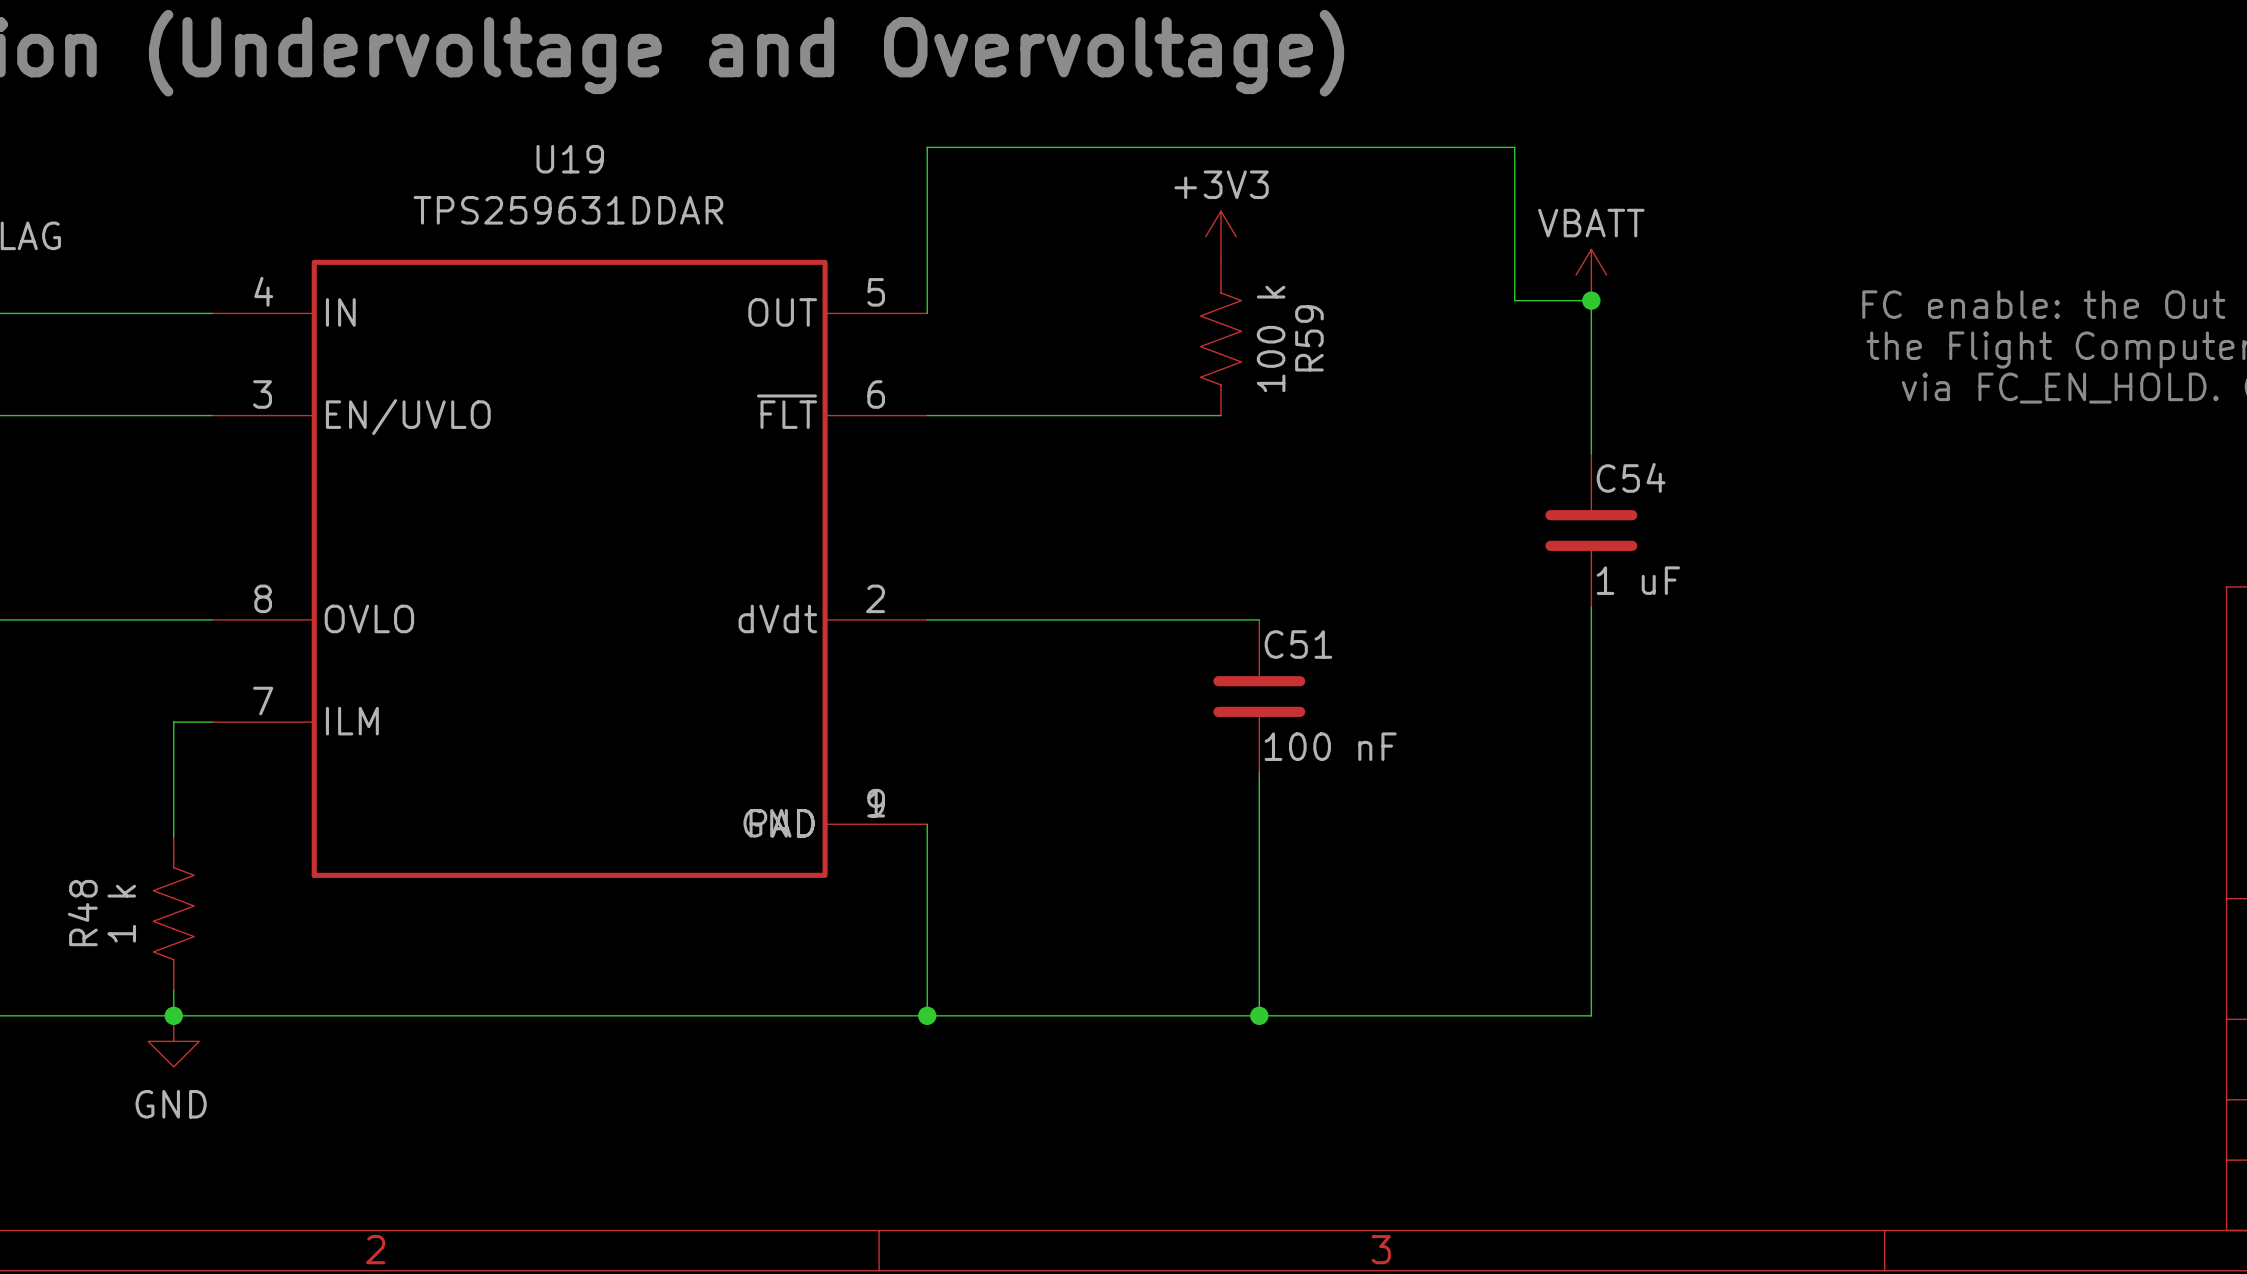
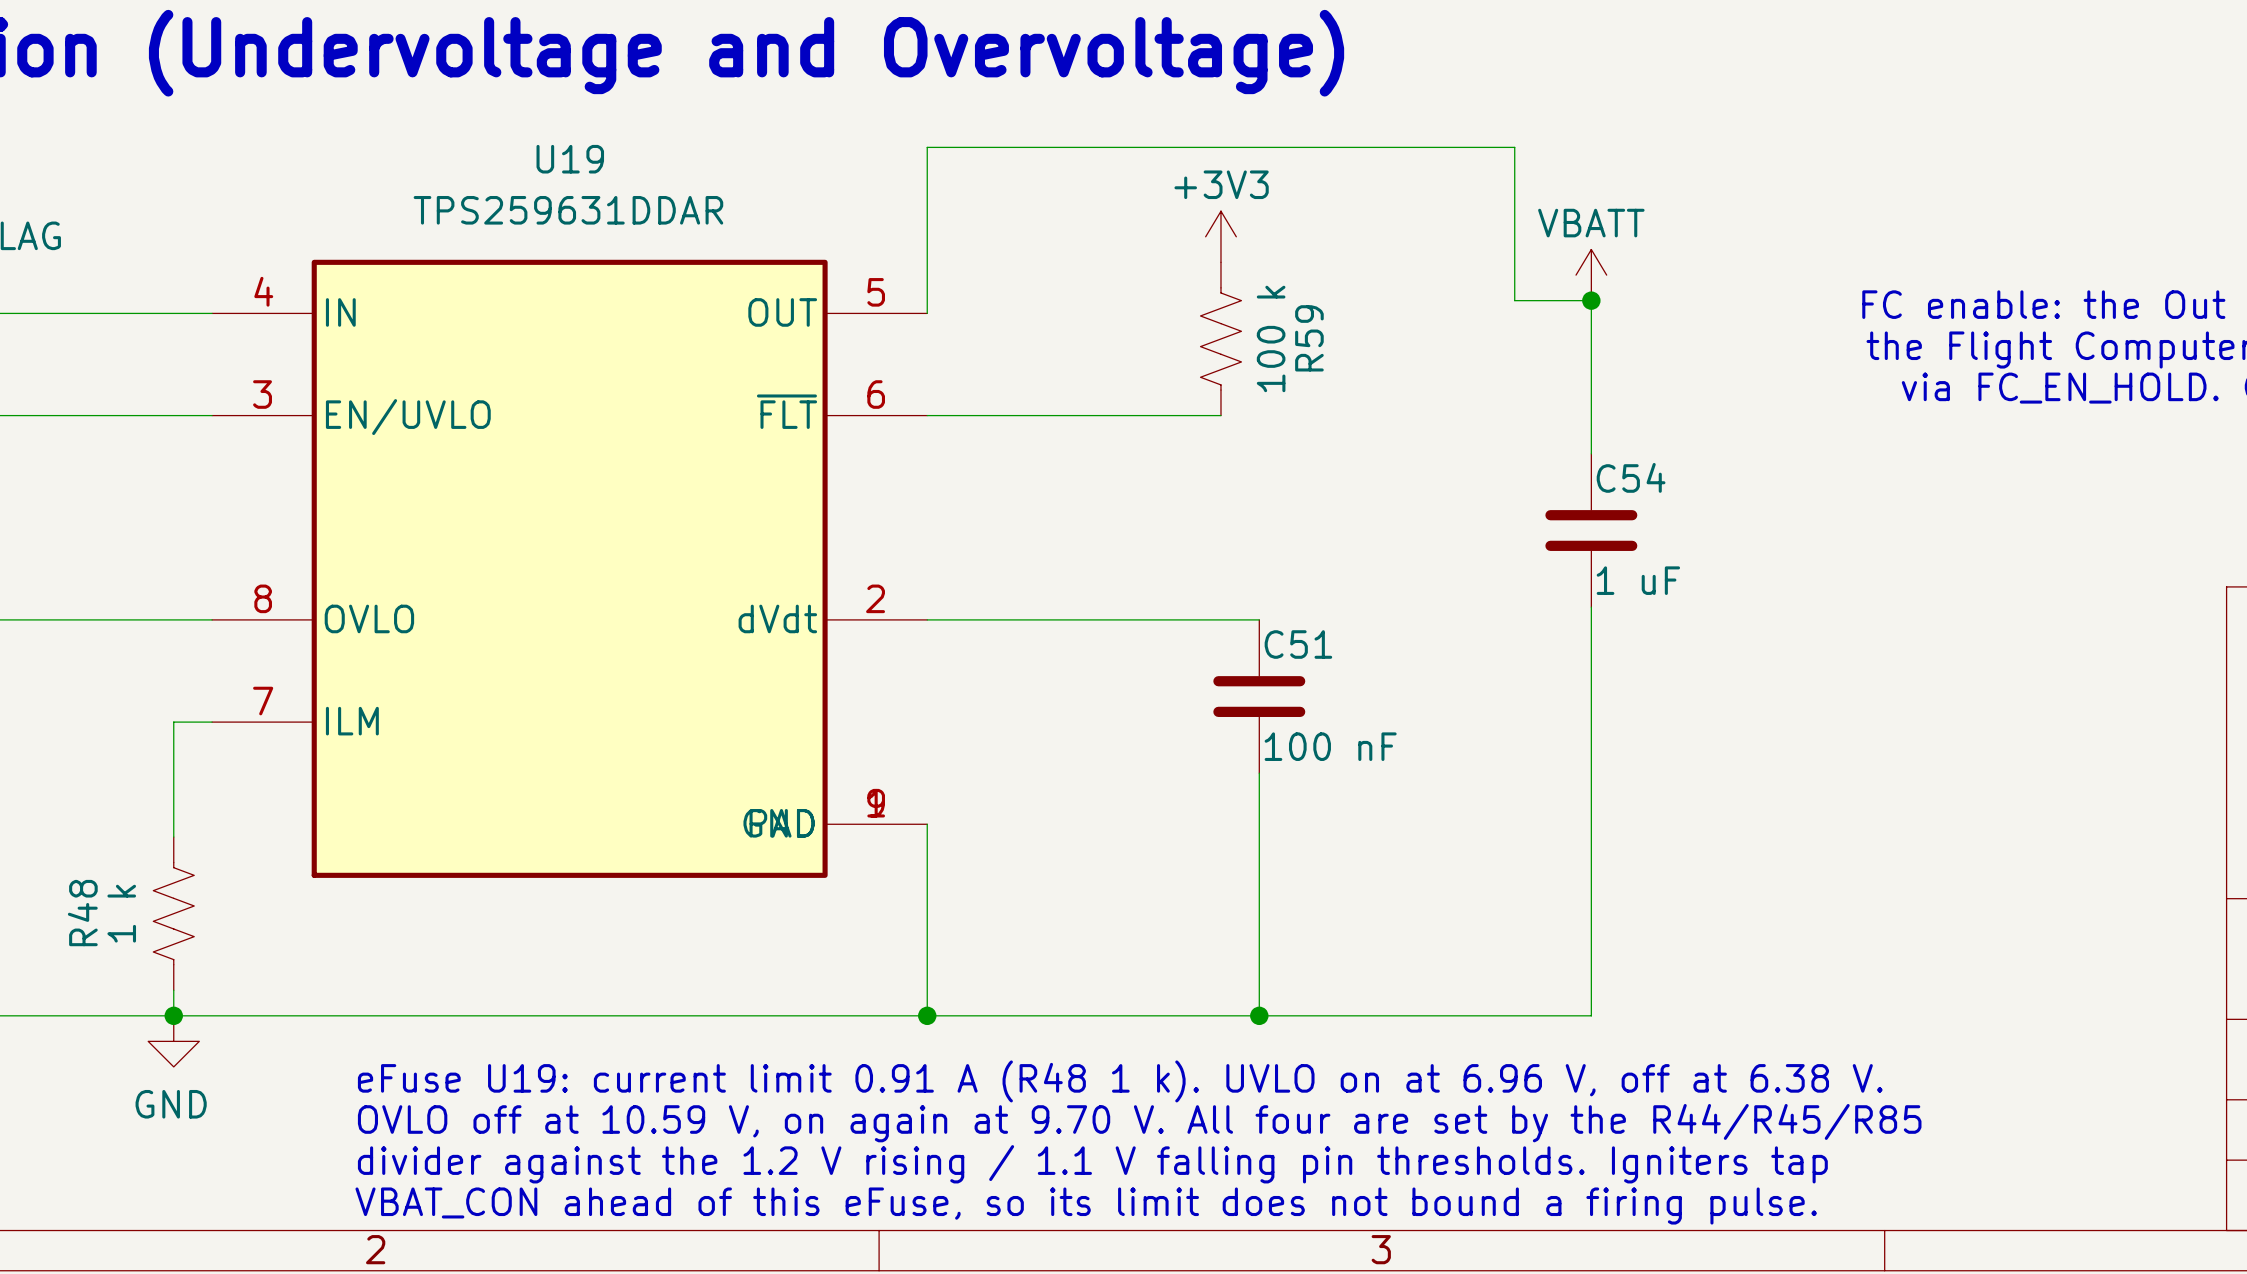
text: none -> eFuse U19: current limit 0.91 A (R48 1 k). UVLO on at 6.96 V, off at 6.38 V. (1120, 1081)
text: none -> OVLO off at 10.59 V, on again at 9.70 V. All four are set by the R44/R45/R85 (1139, 1123)
text: none -> divider against the 1.2 V rising / 1.1 V falling pin thresholds. Igniters tap (1092, 1164)
text: none -> VBAT_CON ahead of this eFuse, so its limit does not bound a firing pulse. (1086, 1206)

